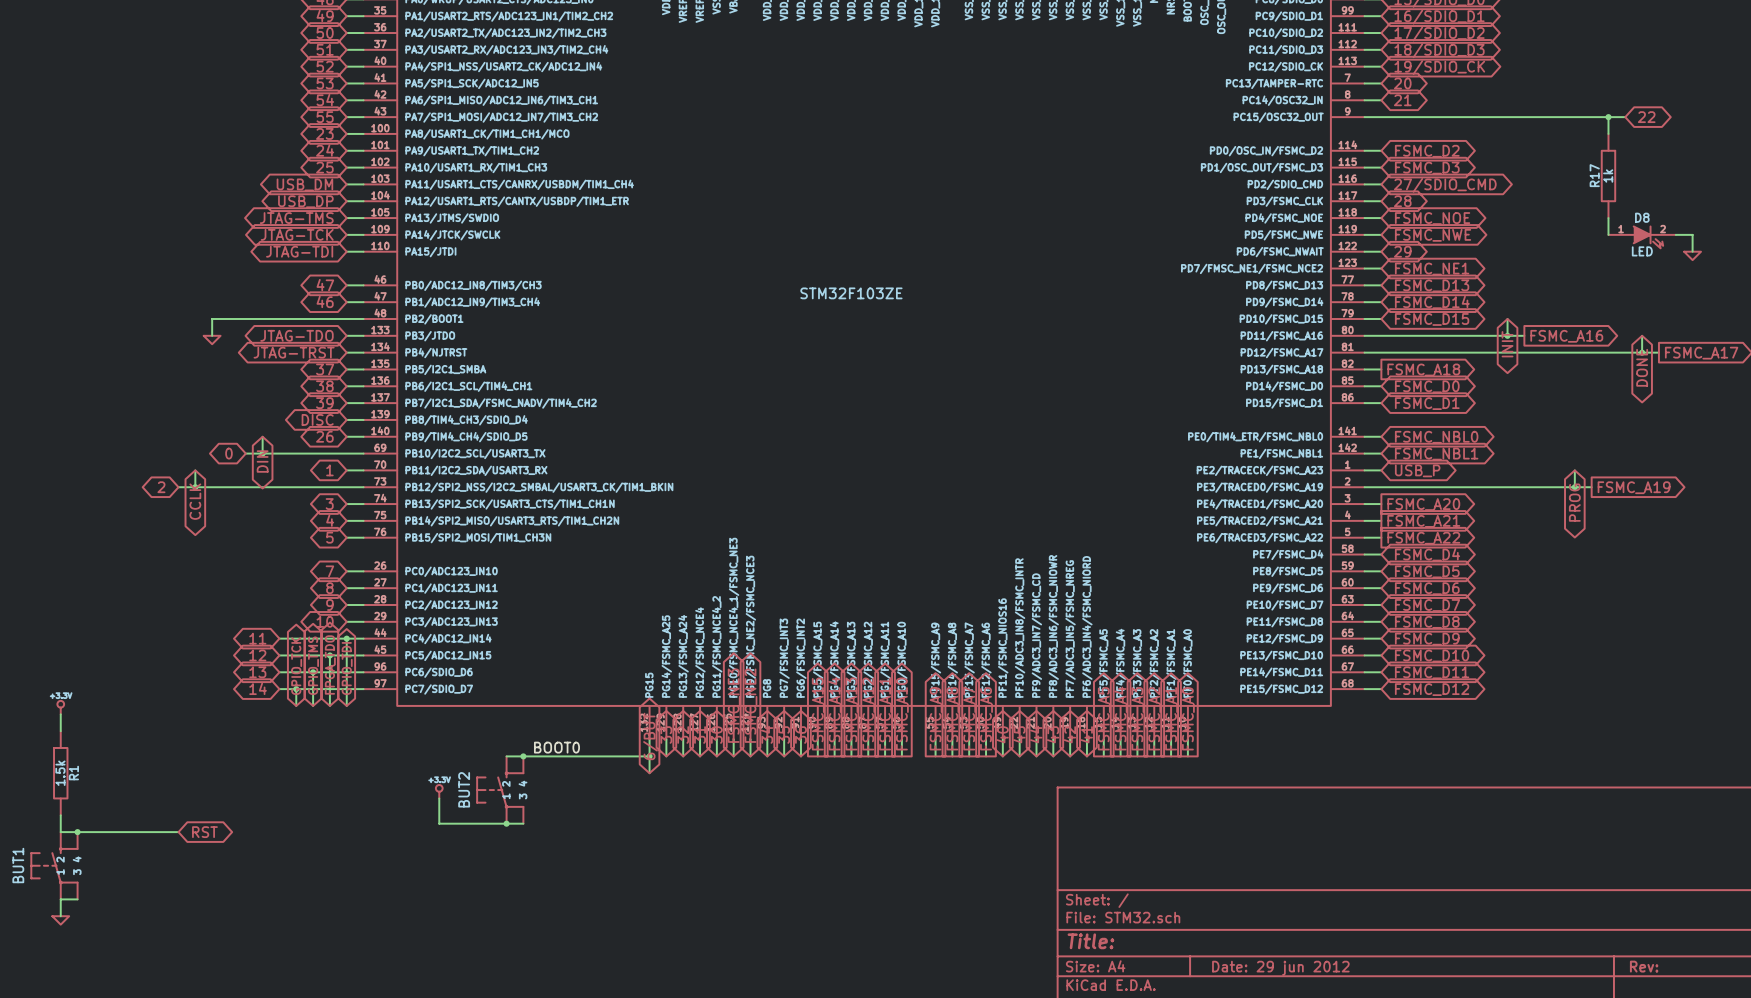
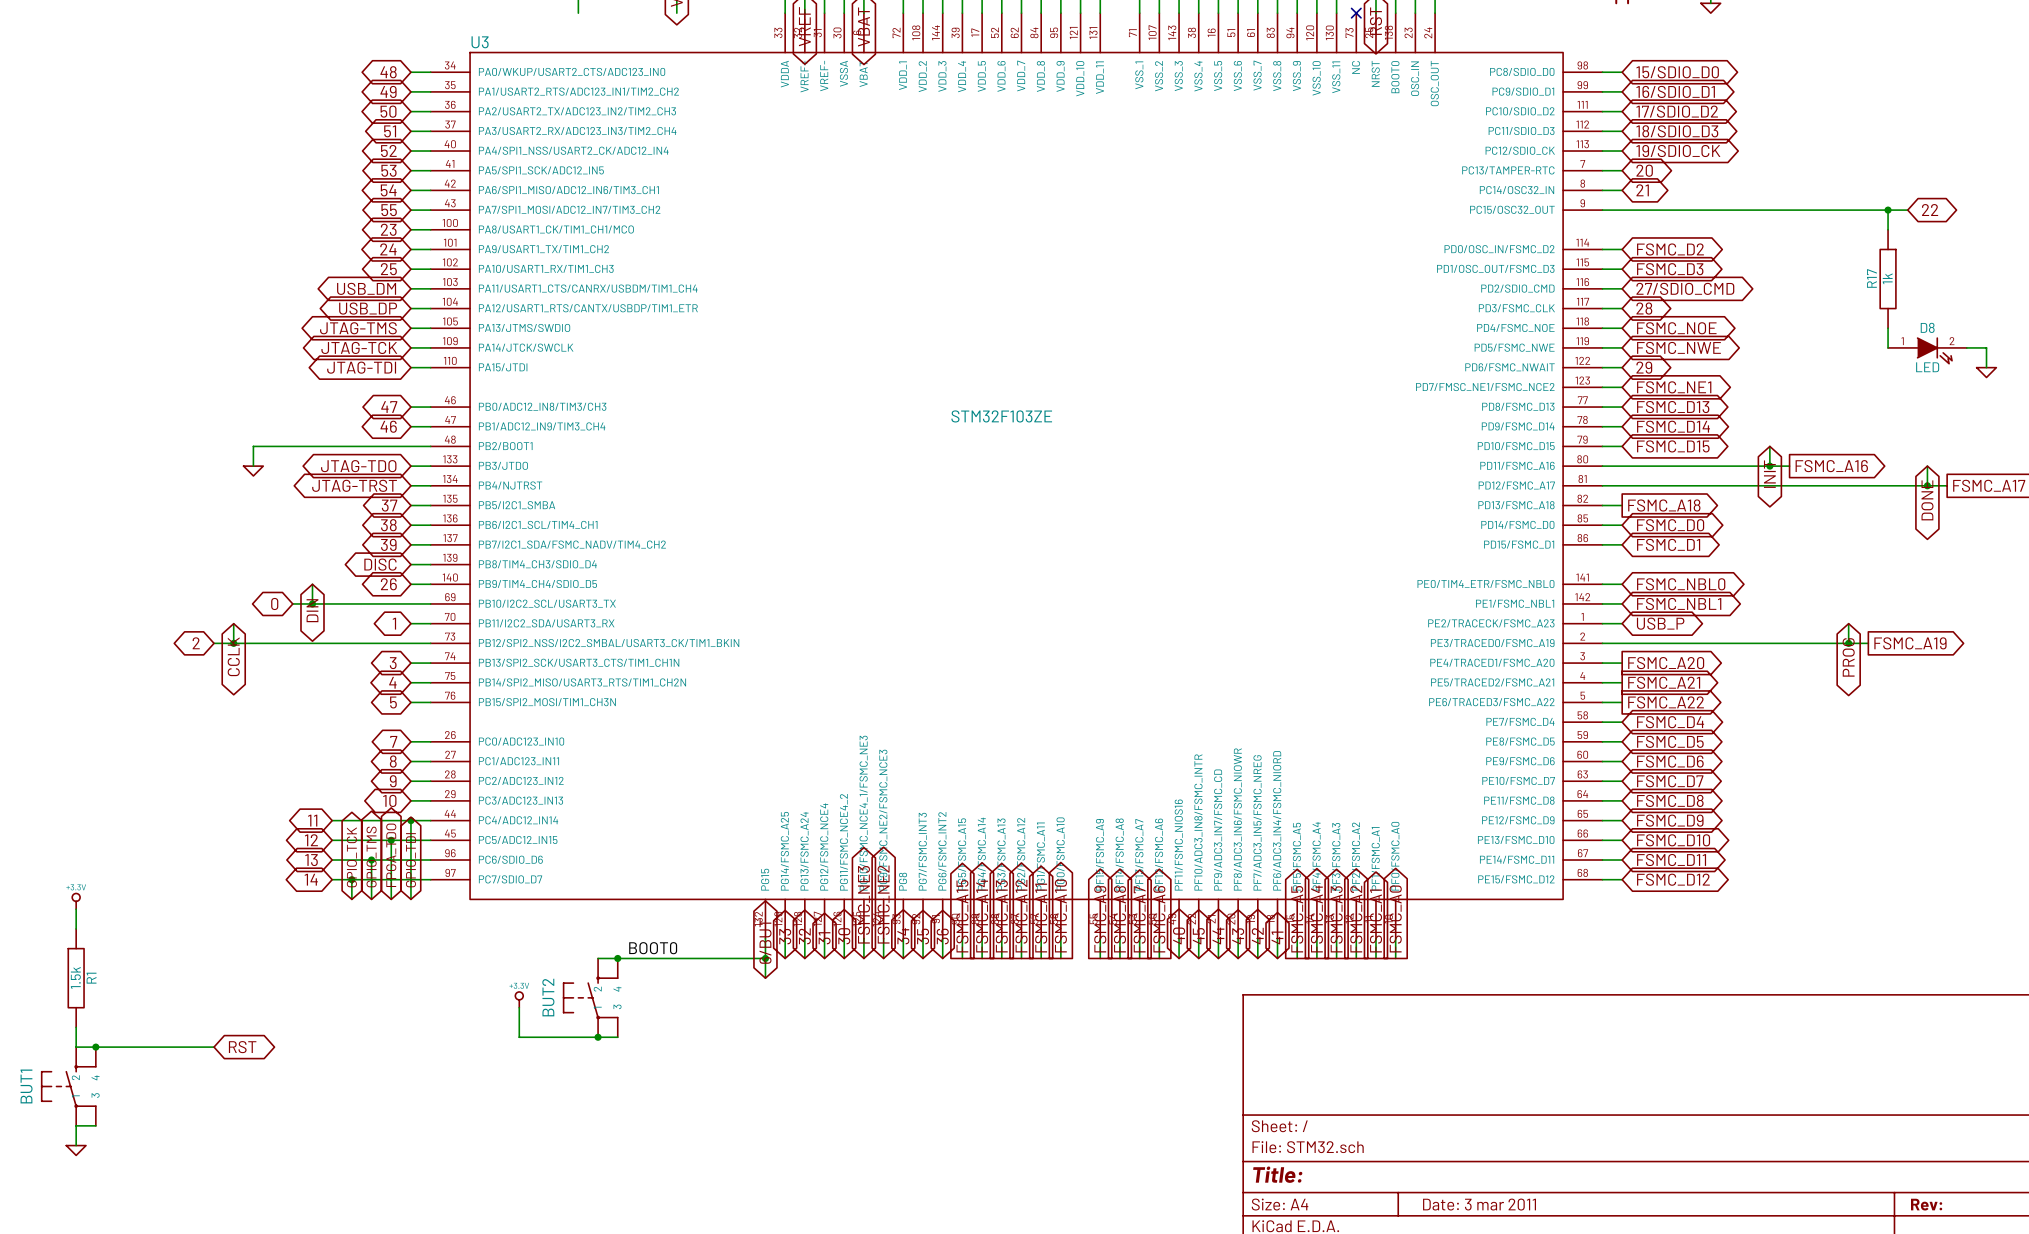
title block: Date: 29 jun 2012 (1280, 968) -> Date: 3 mar 2011 (1479, 1204)

